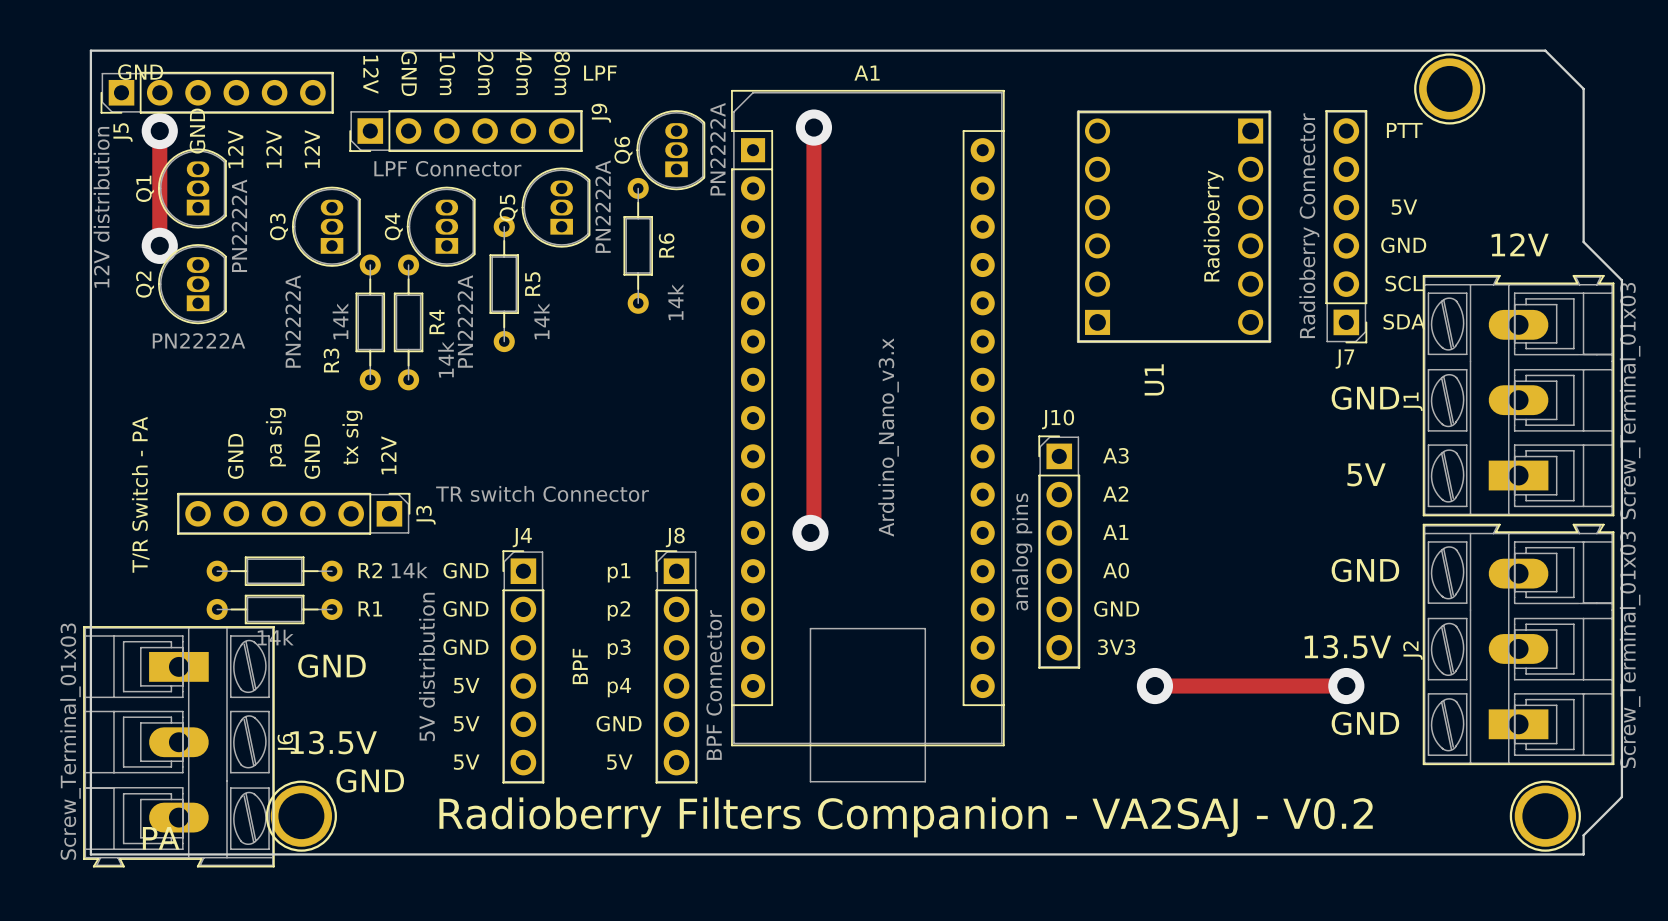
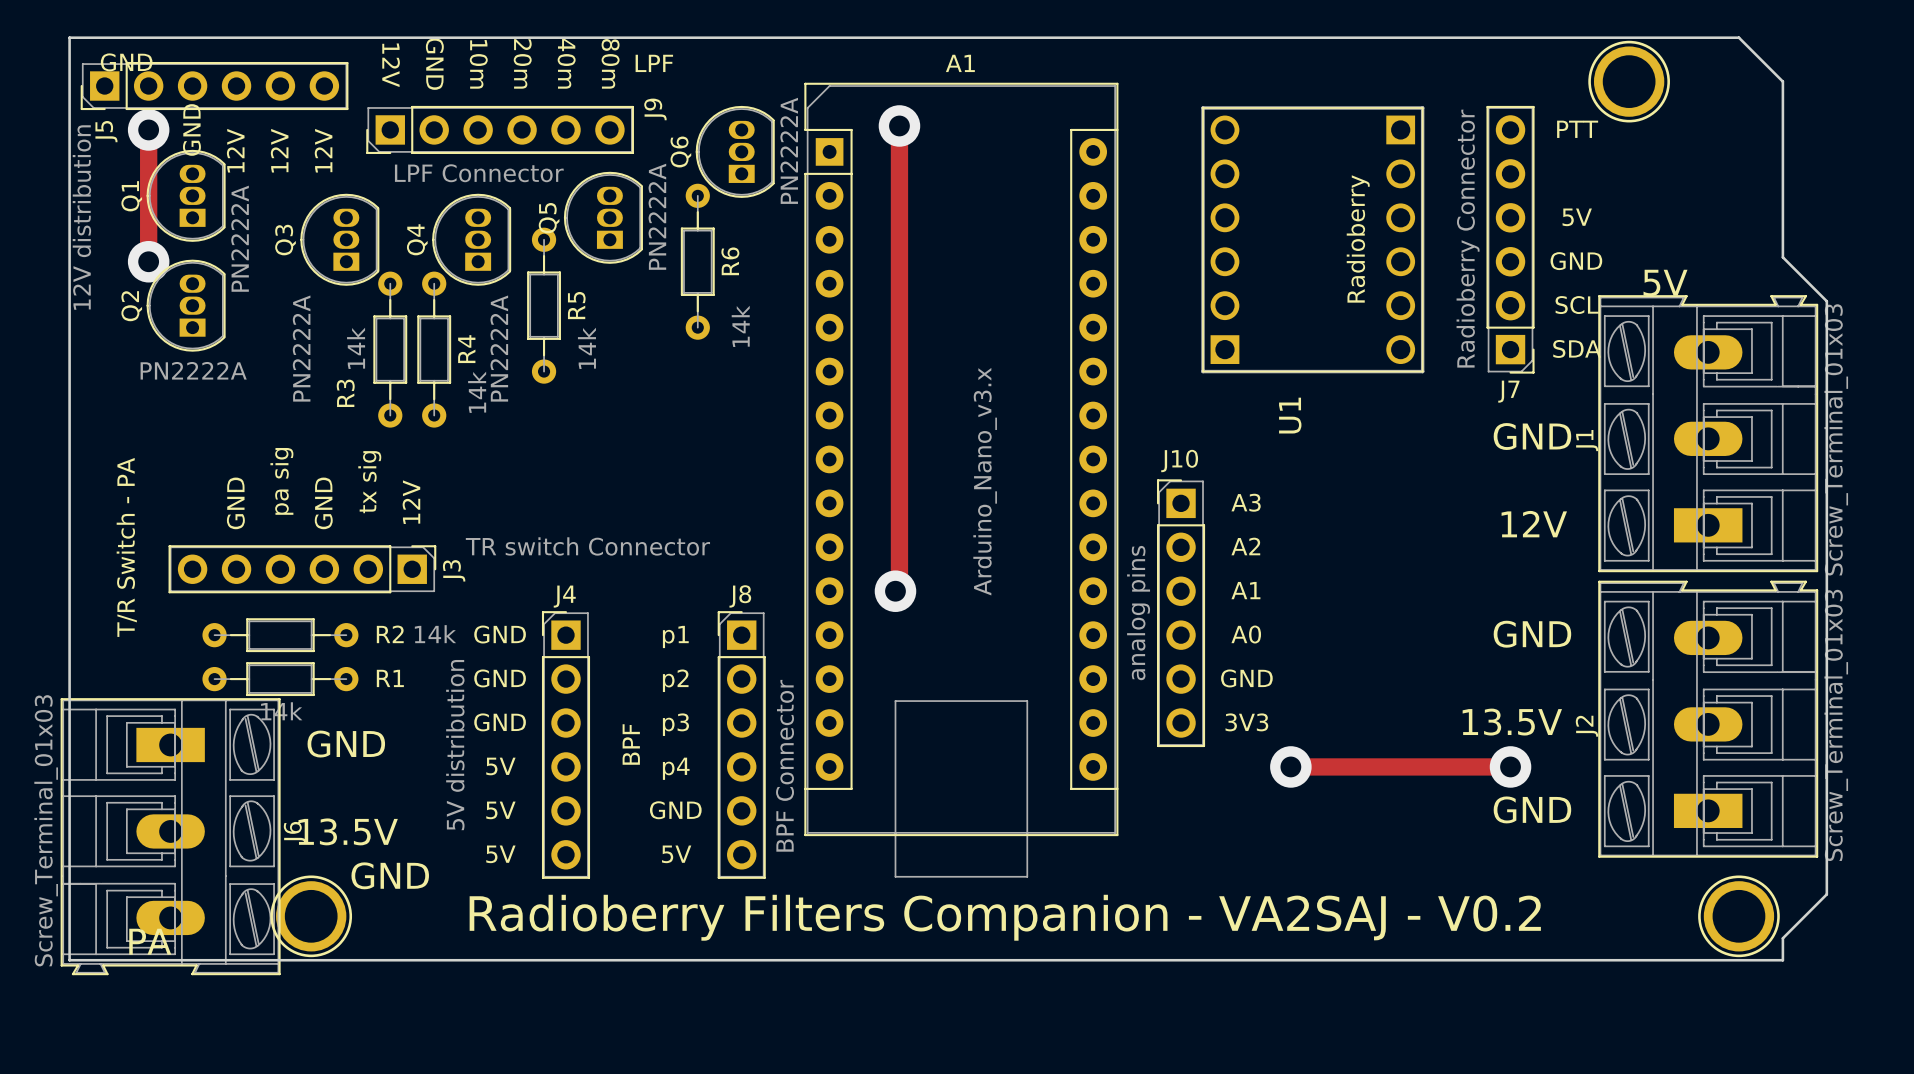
text: 12V (1520, 244) -> none
text: none -> 5V (1665, 282)
text: 5V (1366, 474) -> 12V (1534, 524)

